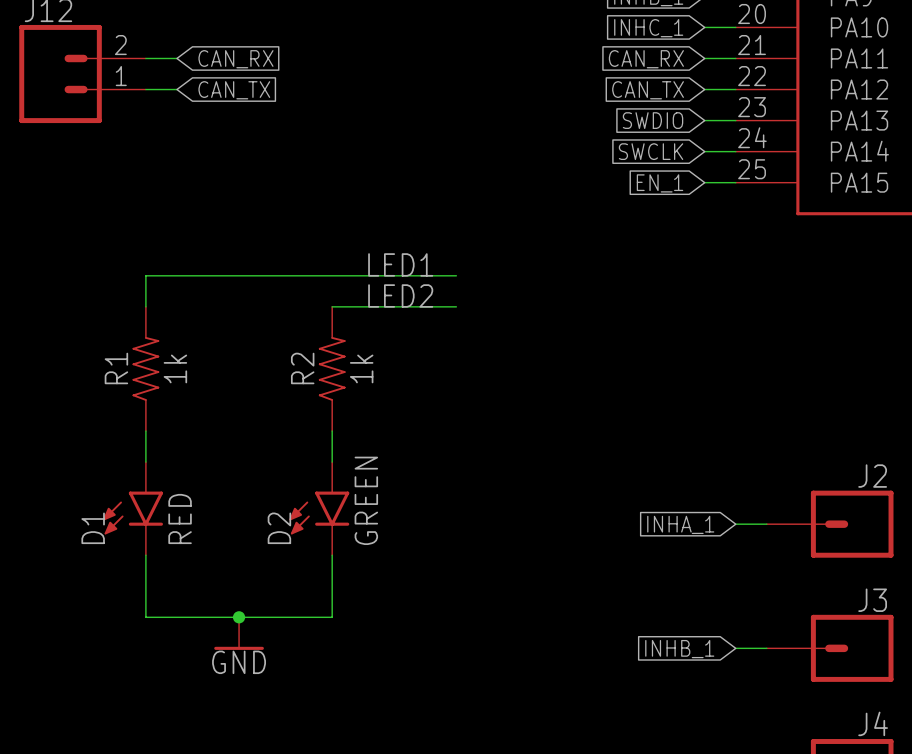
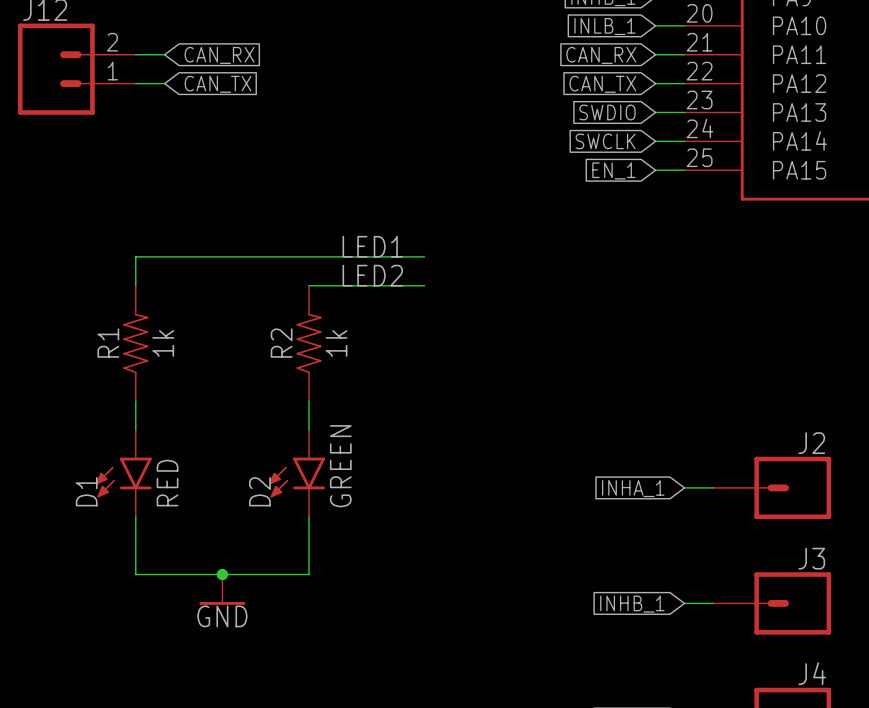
global label: INHC_1 (648, 28) -> INLB_1 (605, 26)

